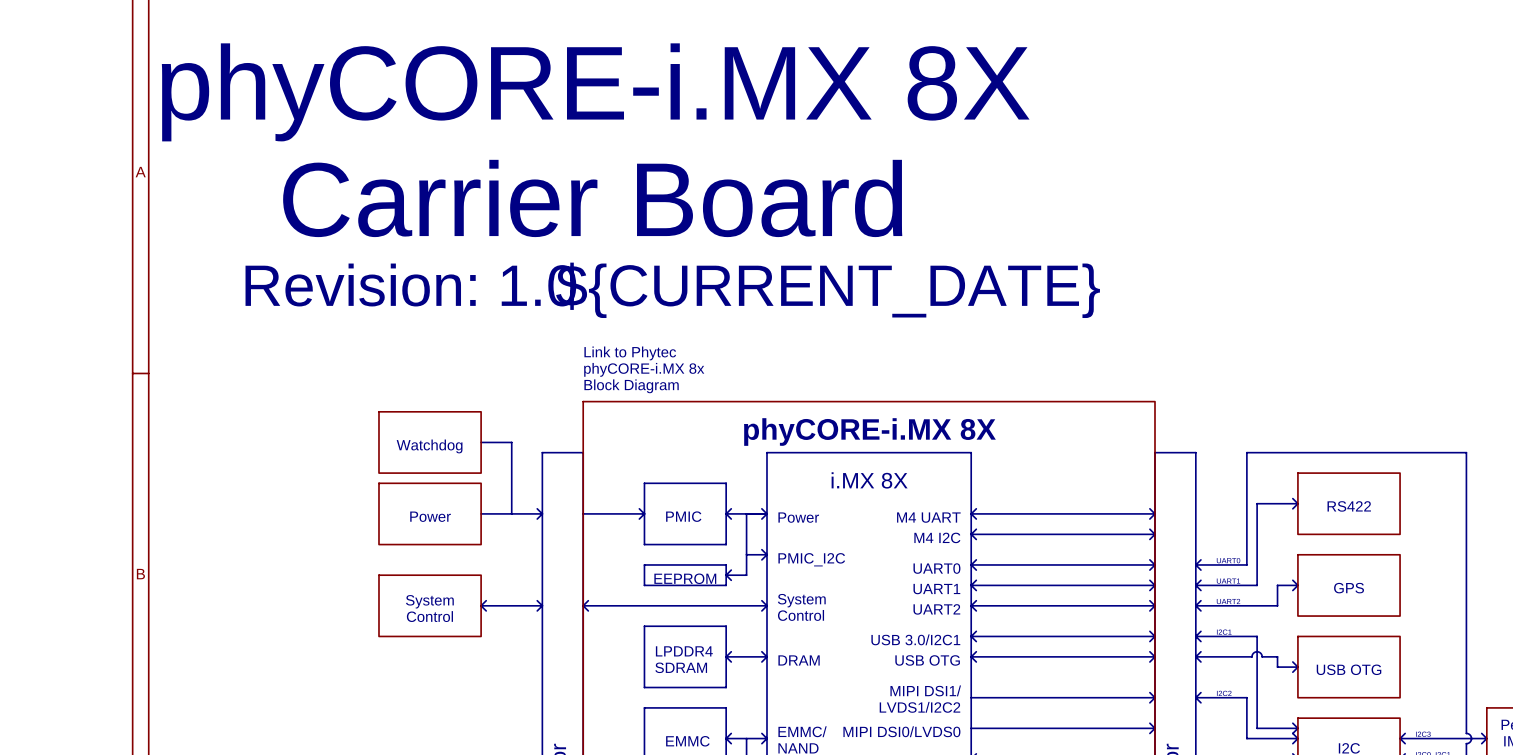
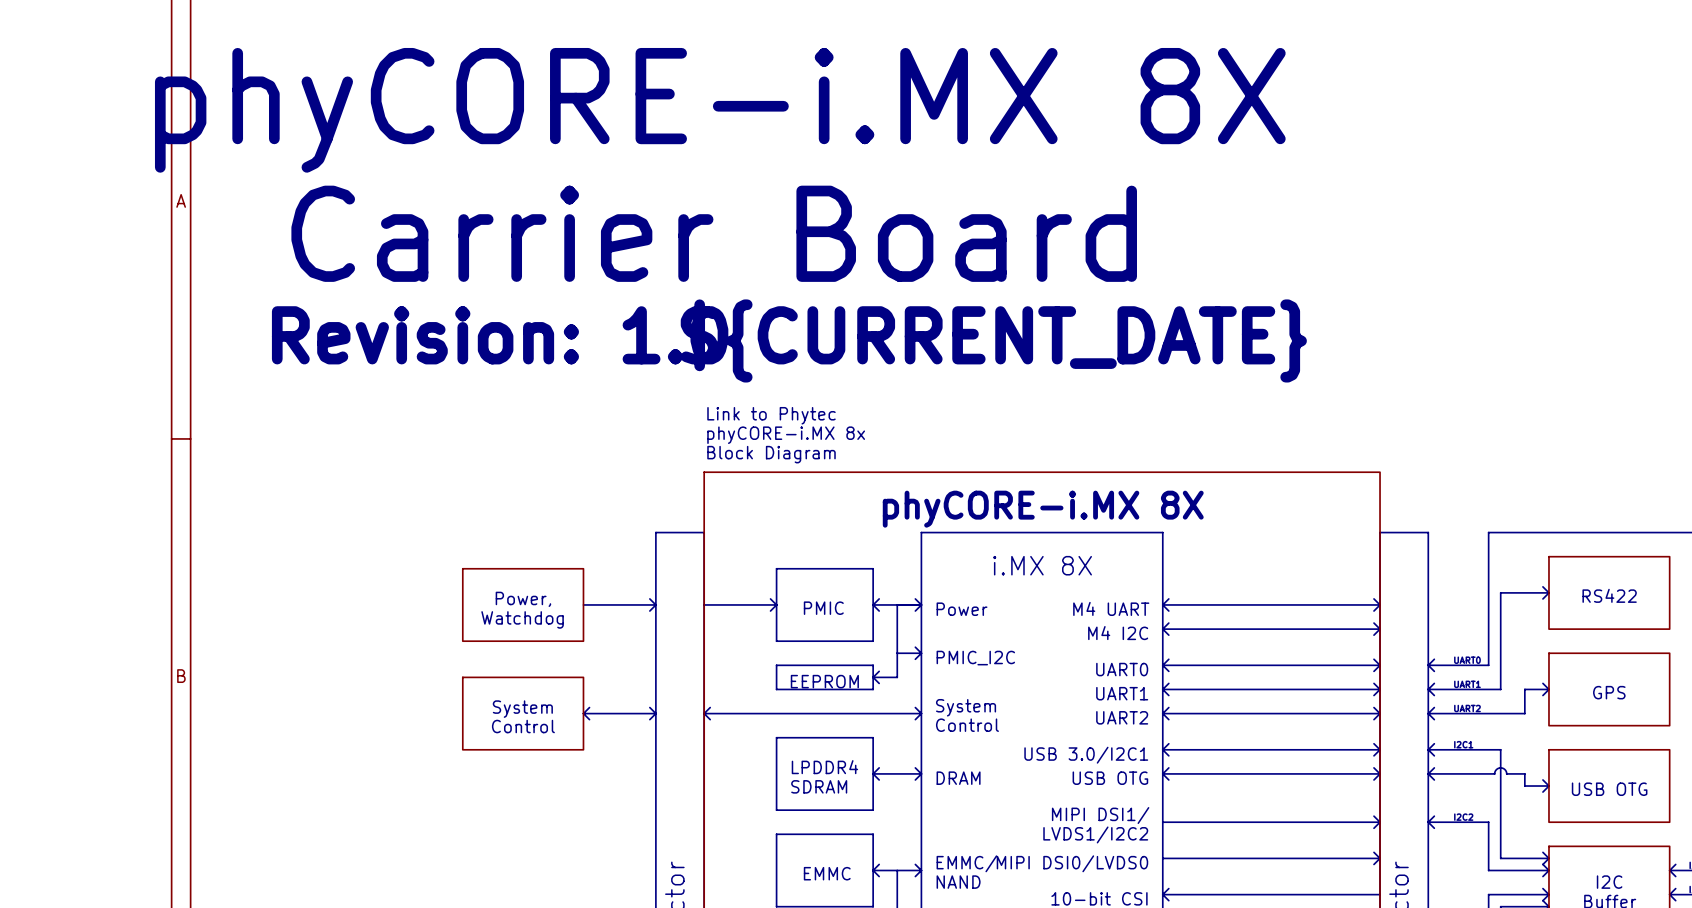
sheet: (430, 442) -> none
line: (481, 442) (511, 442) (511, 513) -> none
text position: Watchdog (429, 446) -> Watchdog (522, 619)
text: Power (430, 516) -> Power, (523, 599)

